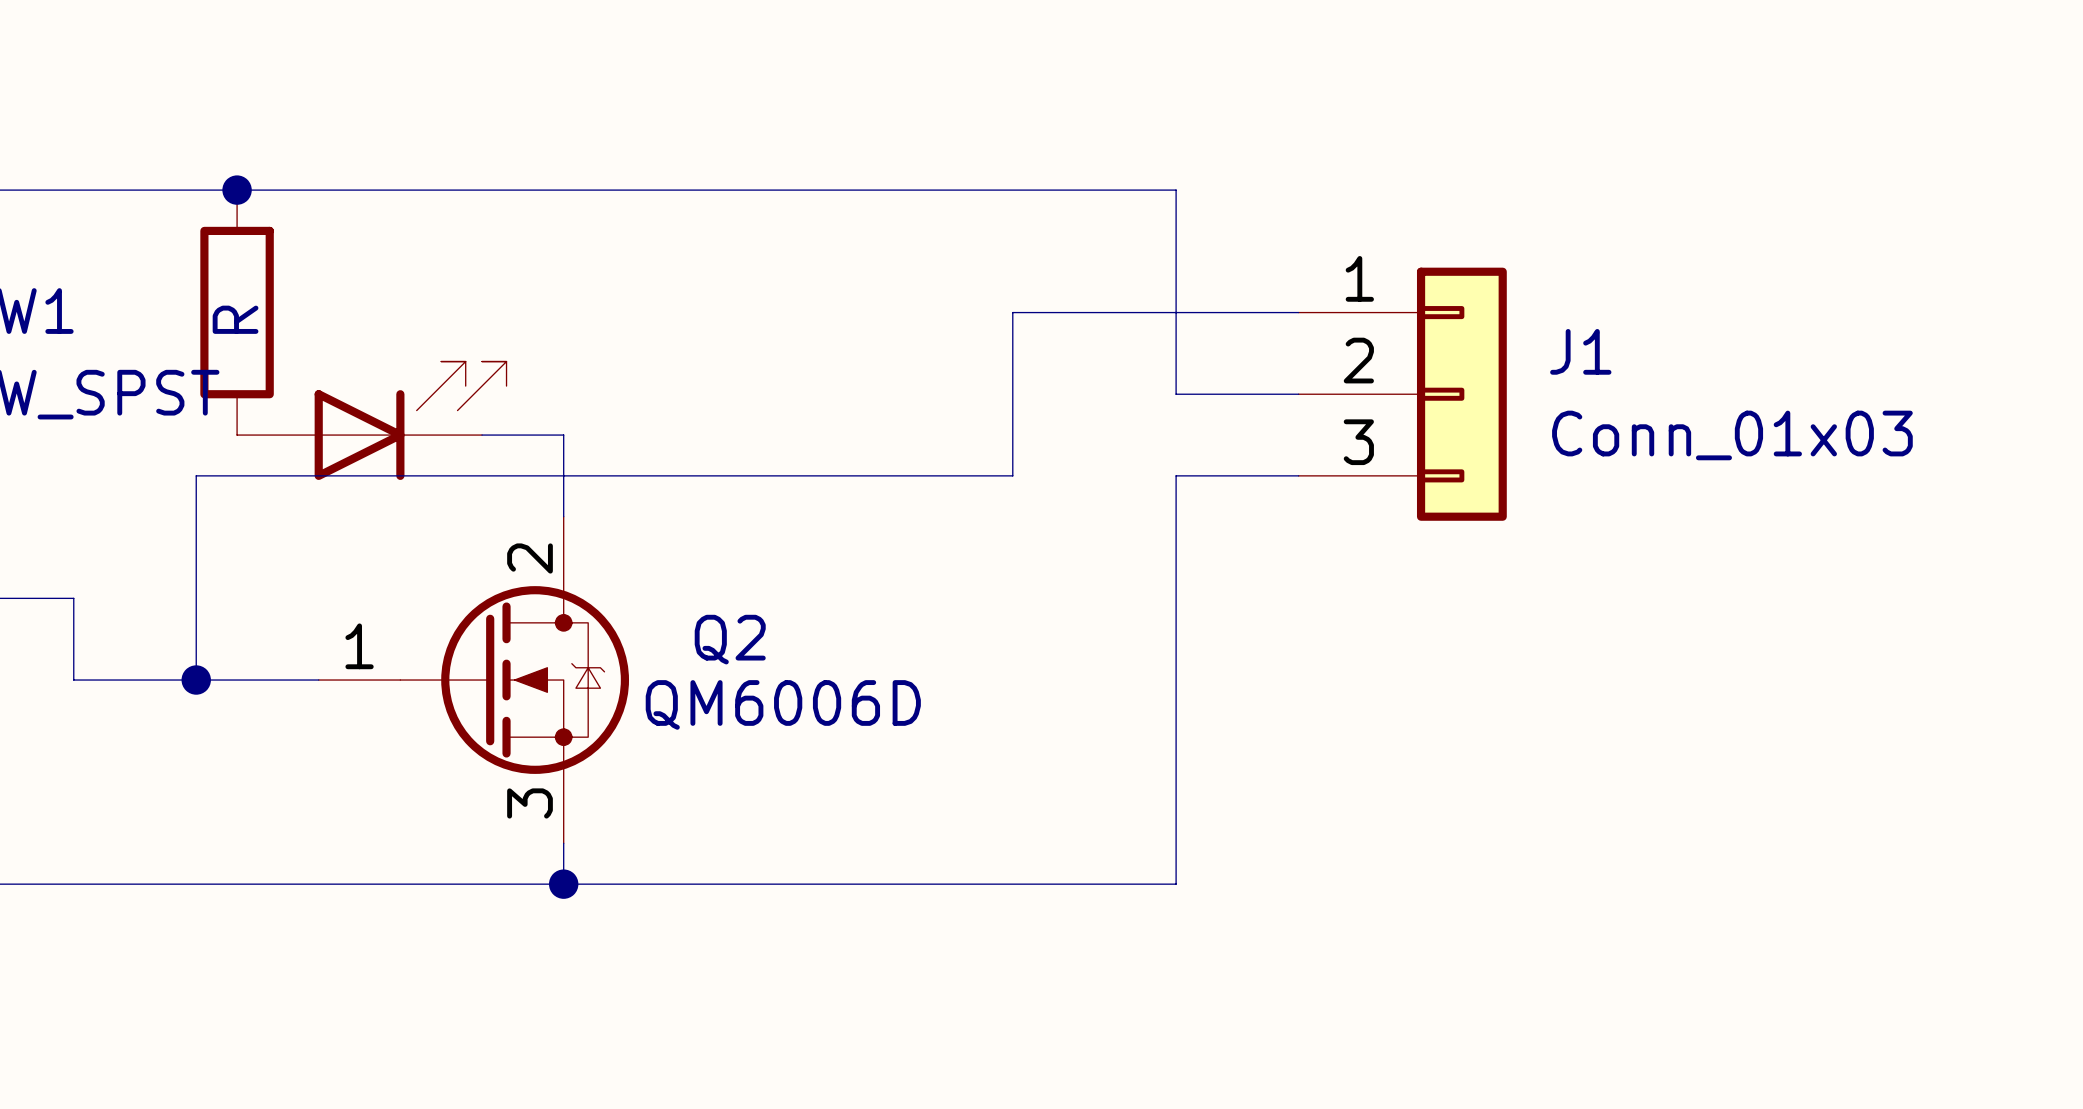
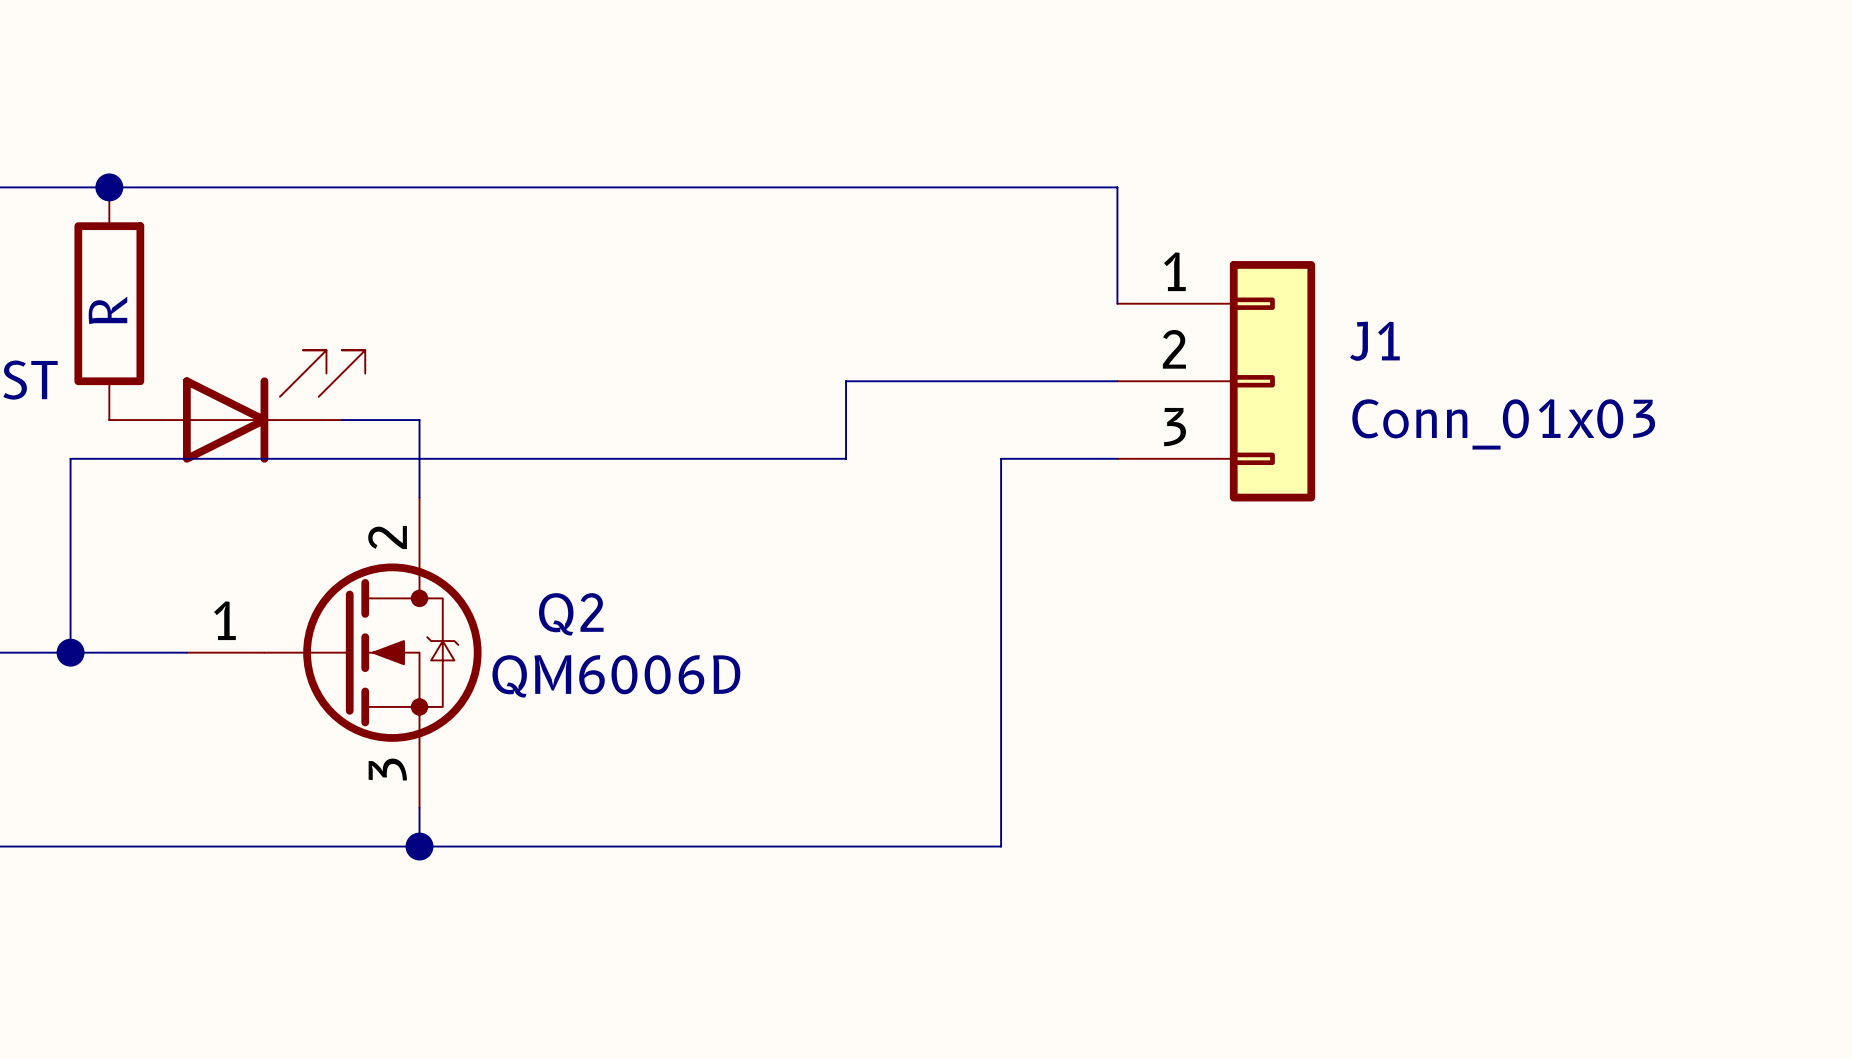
wire: (1176, 190) (1176, 394) -> (1001, 187) (1117, 187) (1117, 303)
wire: (1298, 312) (1012, 312) (1012, 394) -> (1001, 381) (846, 381)

